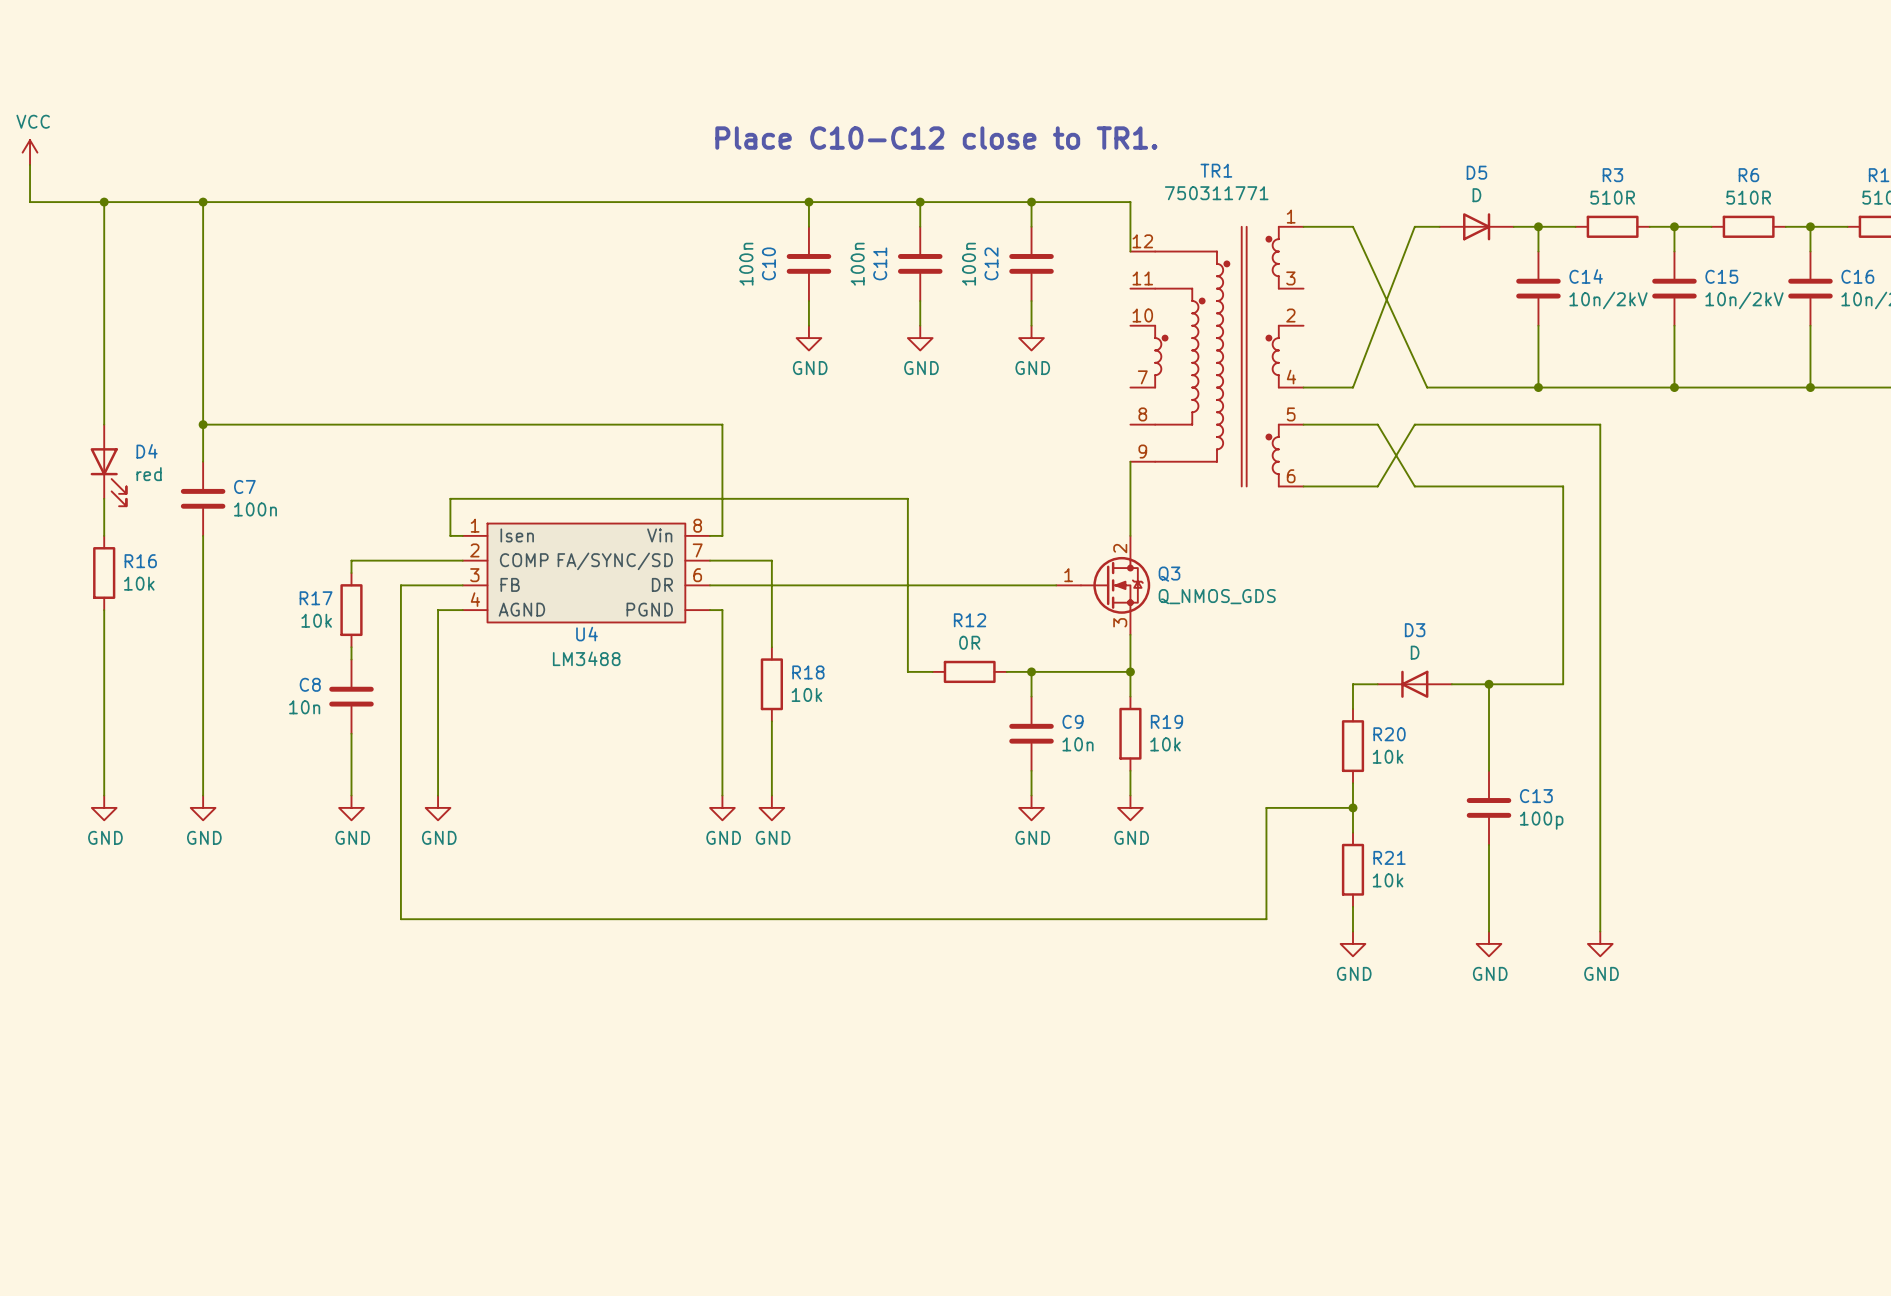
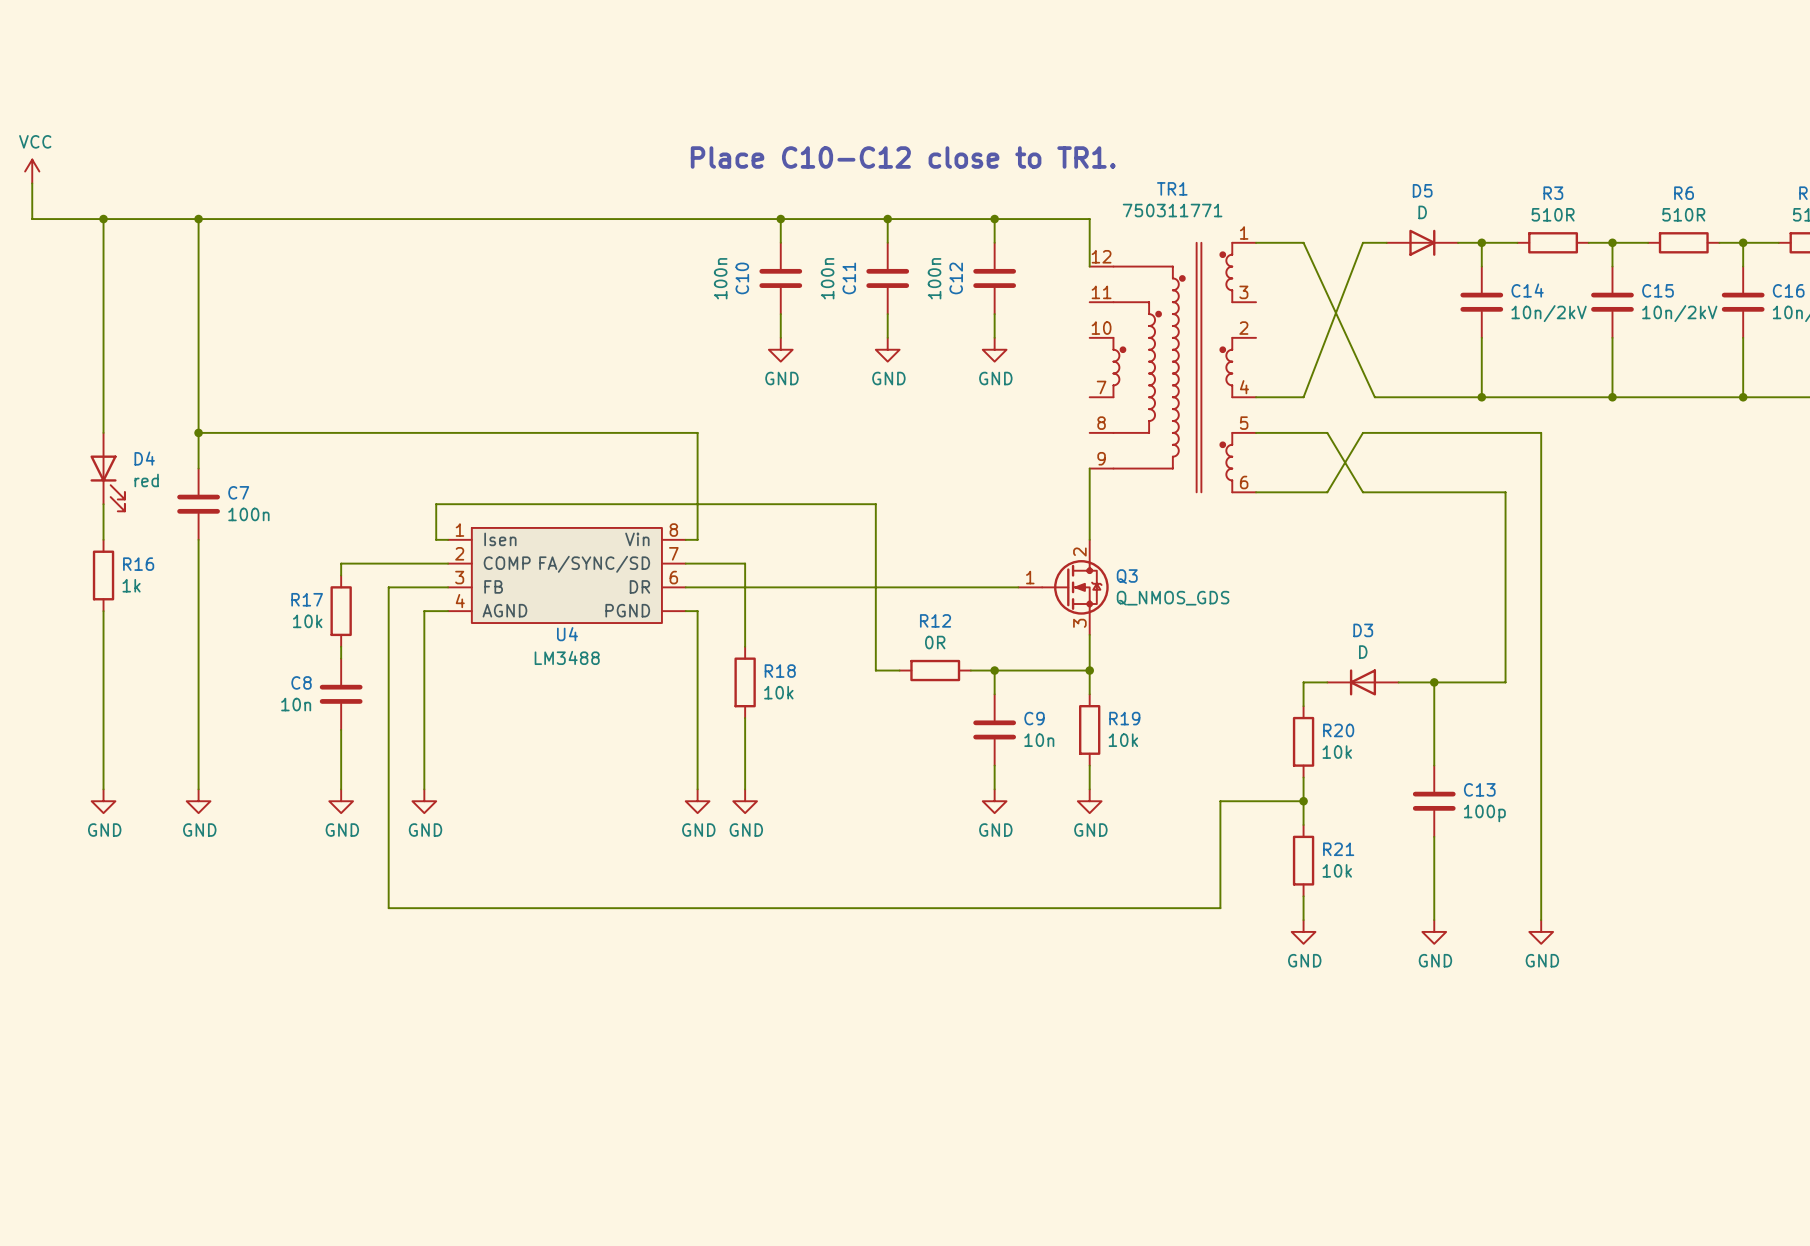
R16 value: 10k (139, 583) -> 1k (131, 585)

